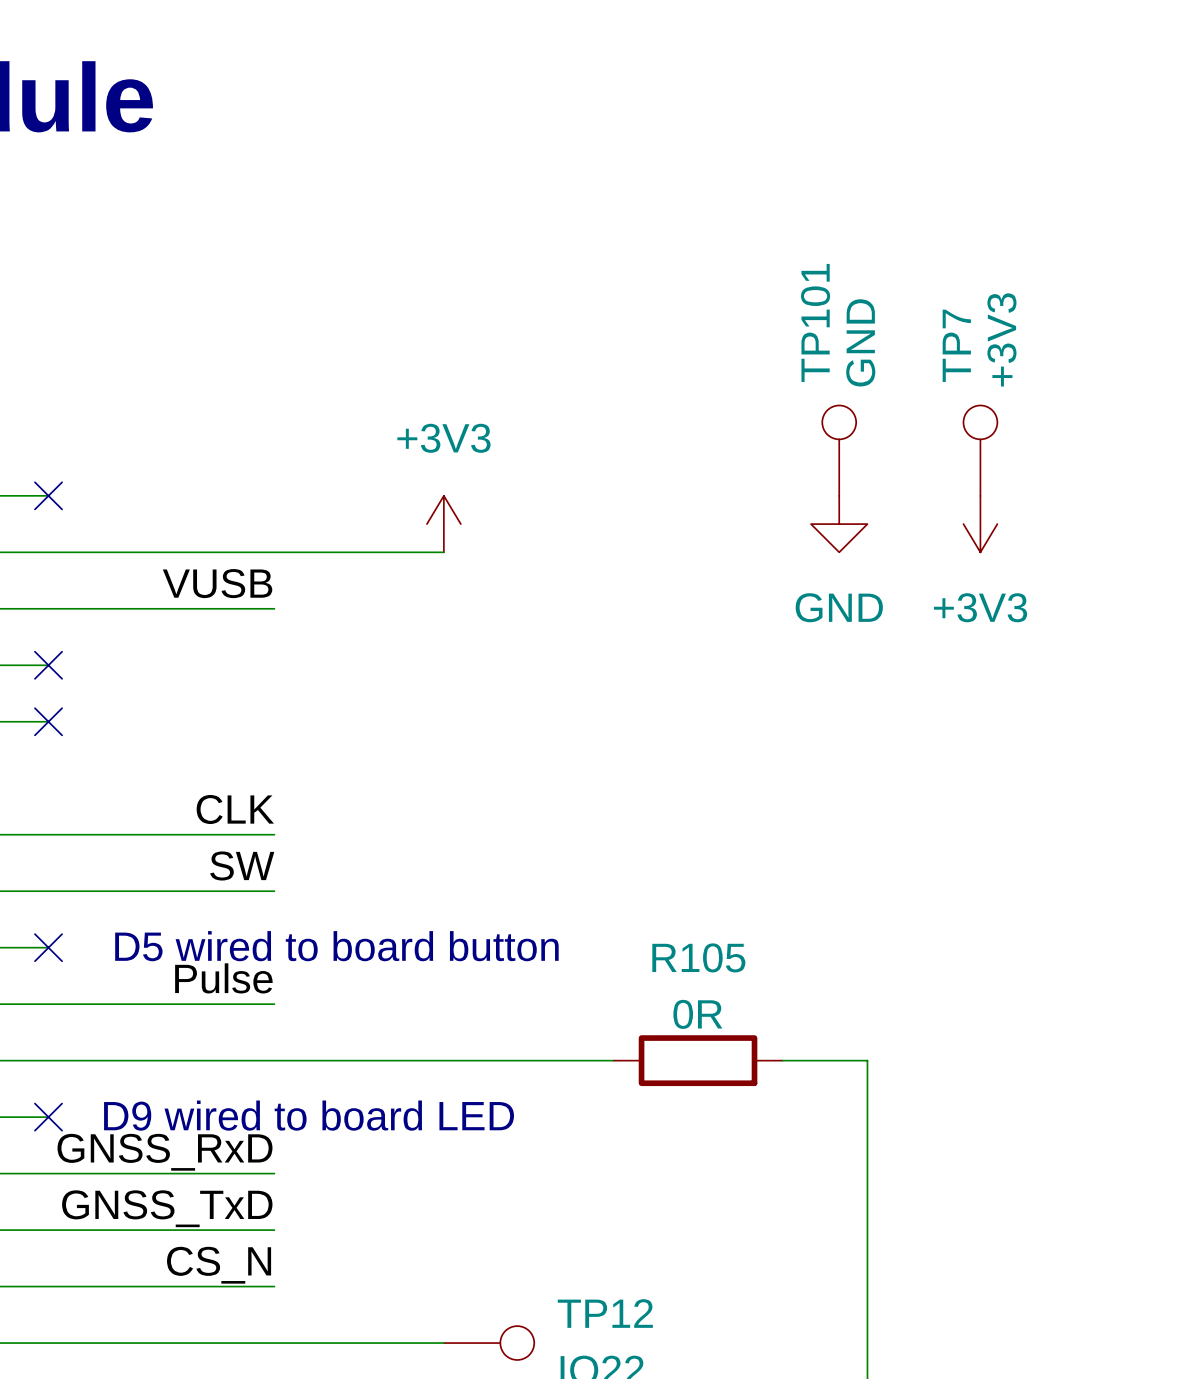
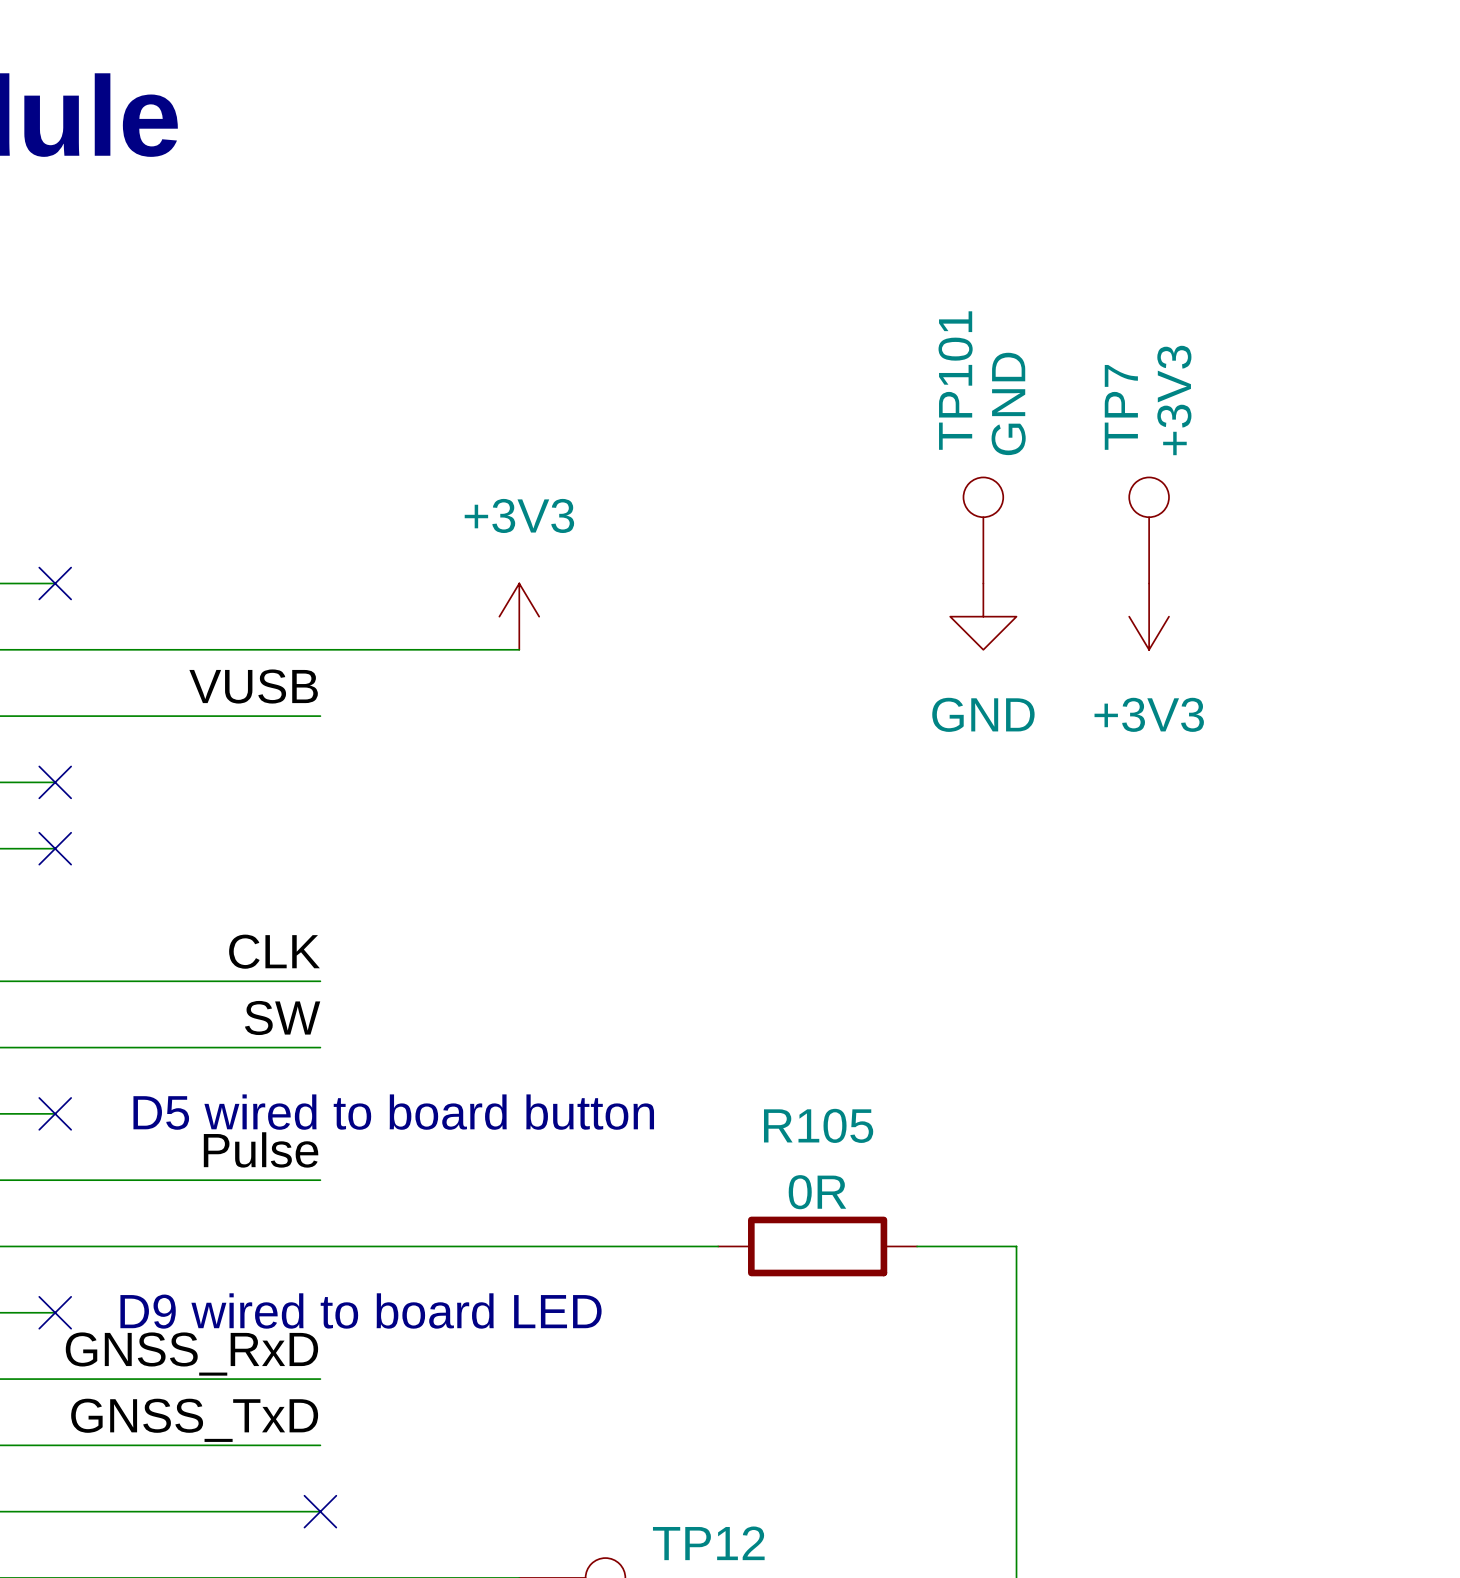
label: CS_N (219, 1265) -> none
no-connect mark: none -> (320, 1511)

